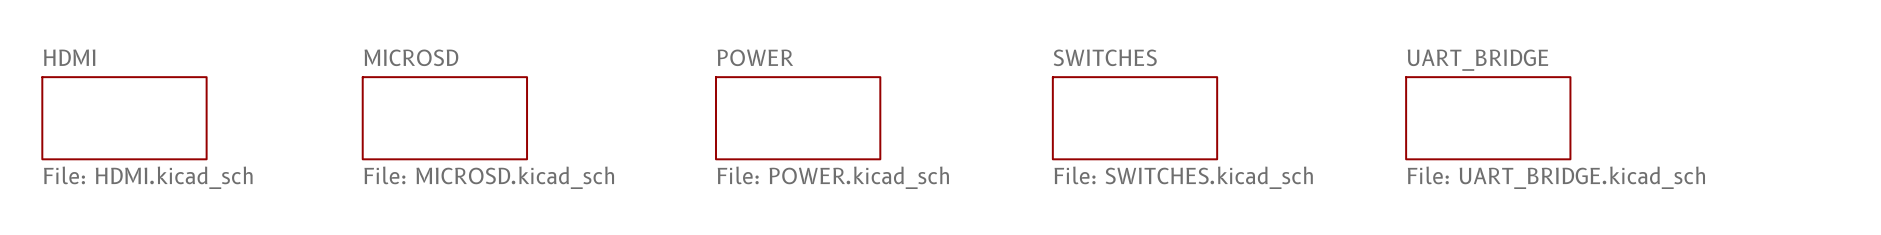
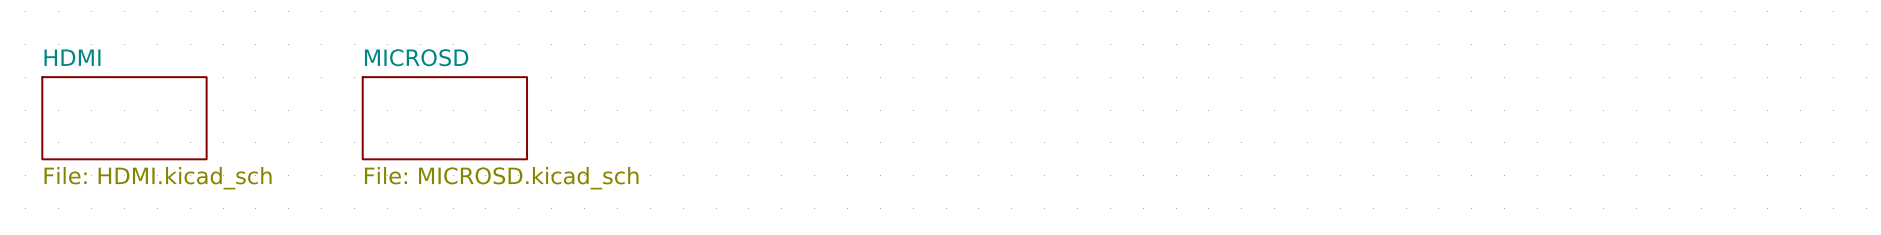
sheet POWER: File: POWER.kicad_sch (798, 118) -> none
sheet SWITCHES: File: SWITCHES.kicad_sch (1135, 118) -> none
sheet UART_BRIDGE: File: UART_BRIDGE.kicad_sch (1488, 118) -> none

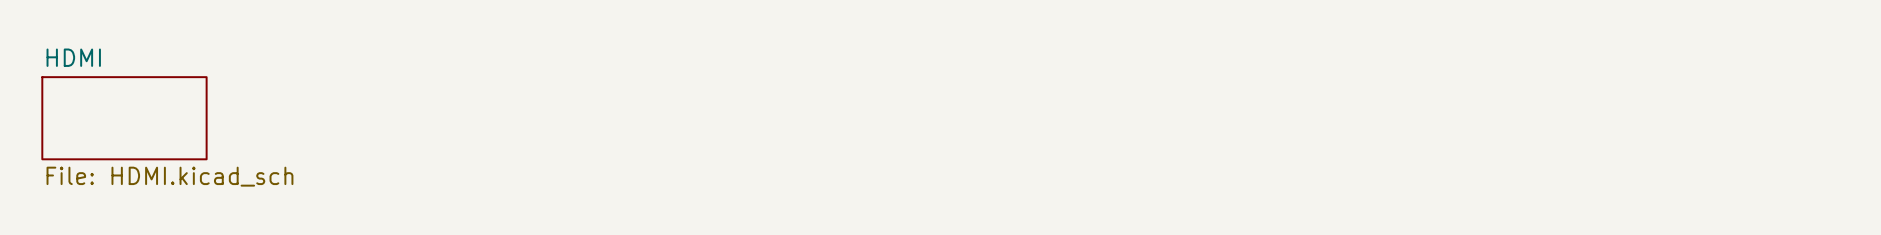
sheet MICROSD: File: MICROSD.kicad_sch (444, 118) -> none

